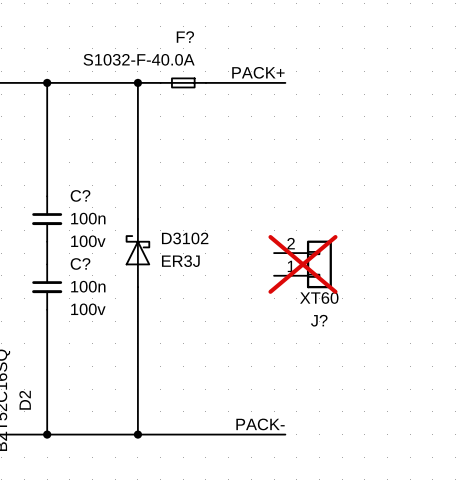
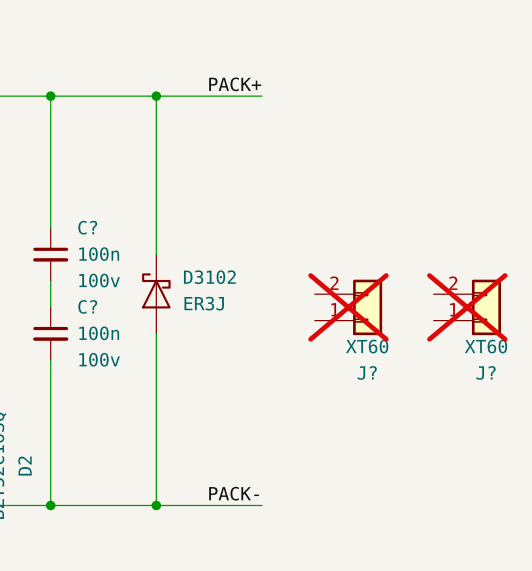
label position: PACK+ (258, 72) -> PACK+ (235, 84)
F?: S1032-F-40.0A (183, 82) -> none
wire: (228, 82) (285, 82) -> none
J?: none -> XT60 (467, 307)
label position: PACK- (260, 424) -> PACK- (234, 493)
wire: (228, 434) (285, 434) -> none

